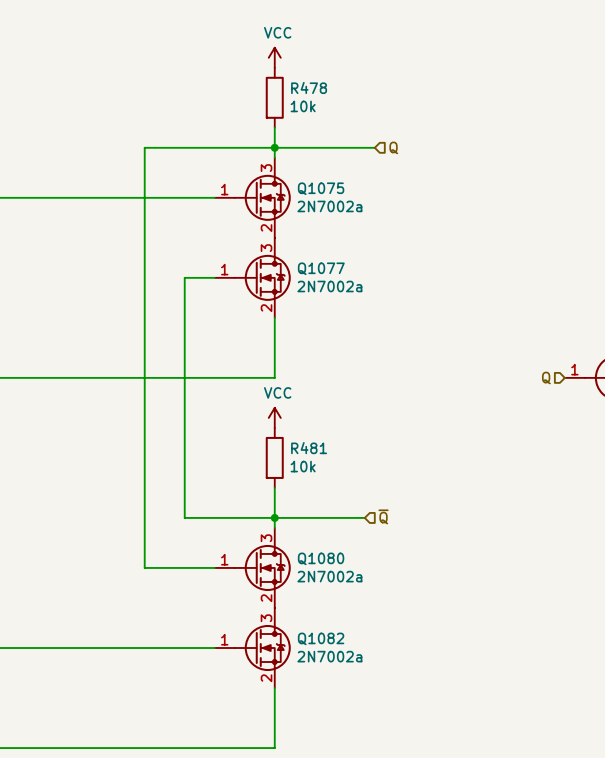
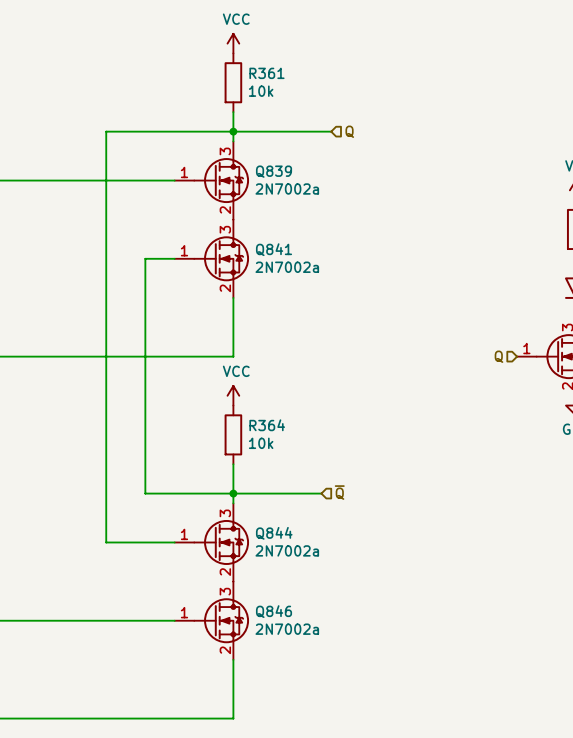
R478 name: R478 (309, 87) -> R361 (266, 73)
Q1075 name: Q1075 (321, 188) -> Q839 (274, 171)
Q1077 name: Q1077 (321, 268) -> Q841 (274, 249)
R481 name: R481 (309, 448) -> R364 (267, 425)
Q1080 name: Q1080 (321, 558) -> Q844 (274, 533)
Q1082 name: Q1082 (321, 638) -> Q846 (274, 611)

